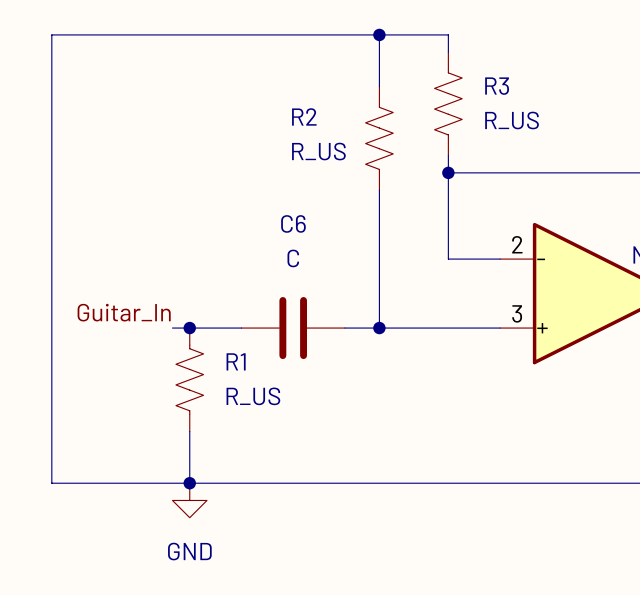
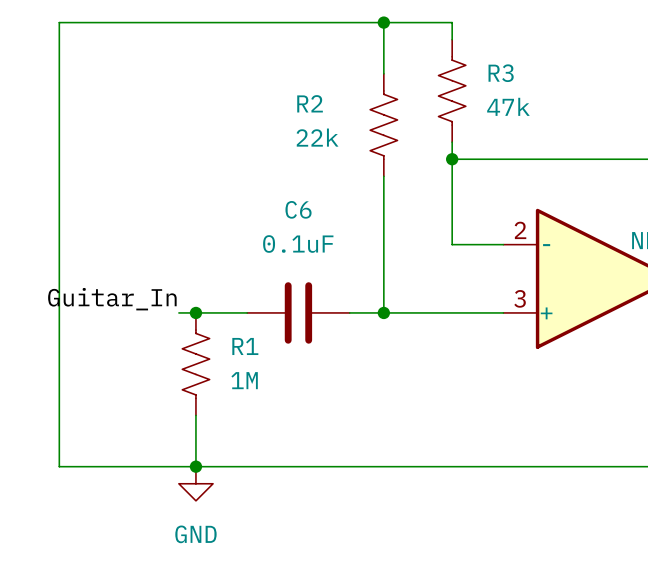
R3 value: R_US (512, 120) -> 47k (508, 106)
R2 value: R_US (318, 151) -> 22k (317, 137)
C6 value: C (293, 258) -> 0.1uF (298, 244)
R1 value: R_US (253, 396) -> 1M (244, 380)

